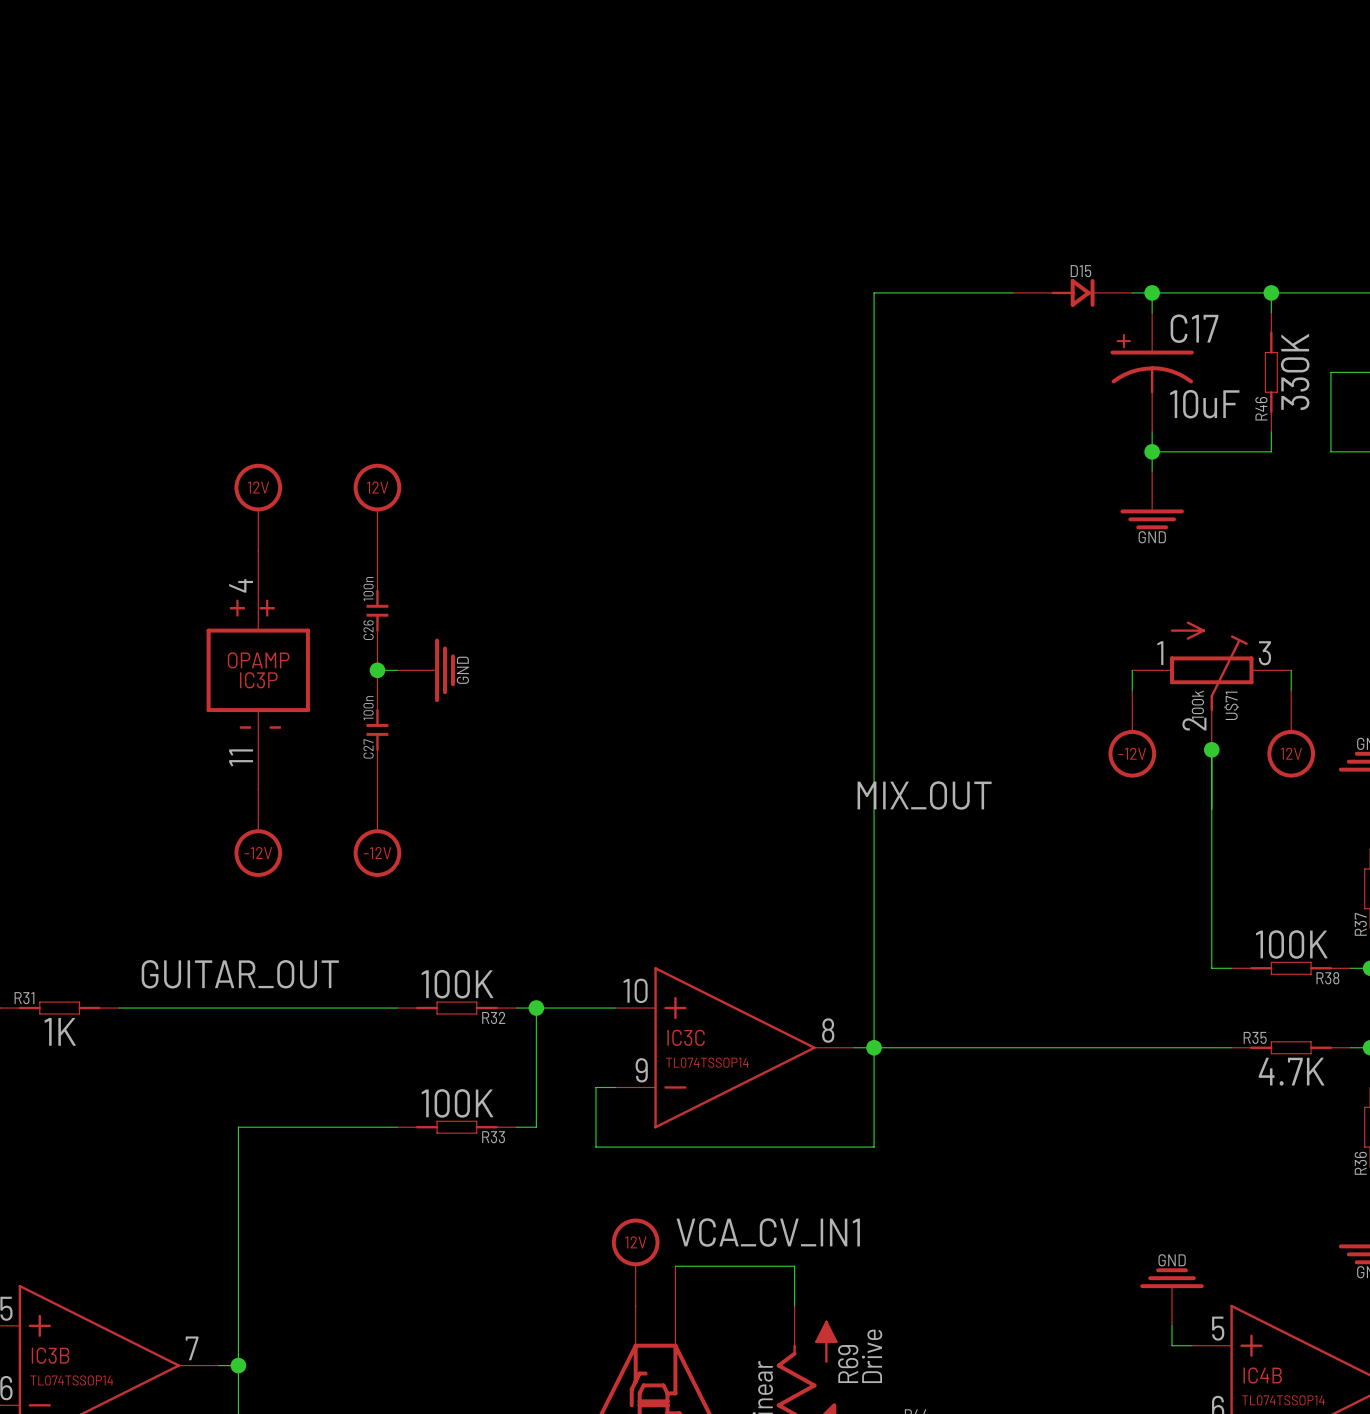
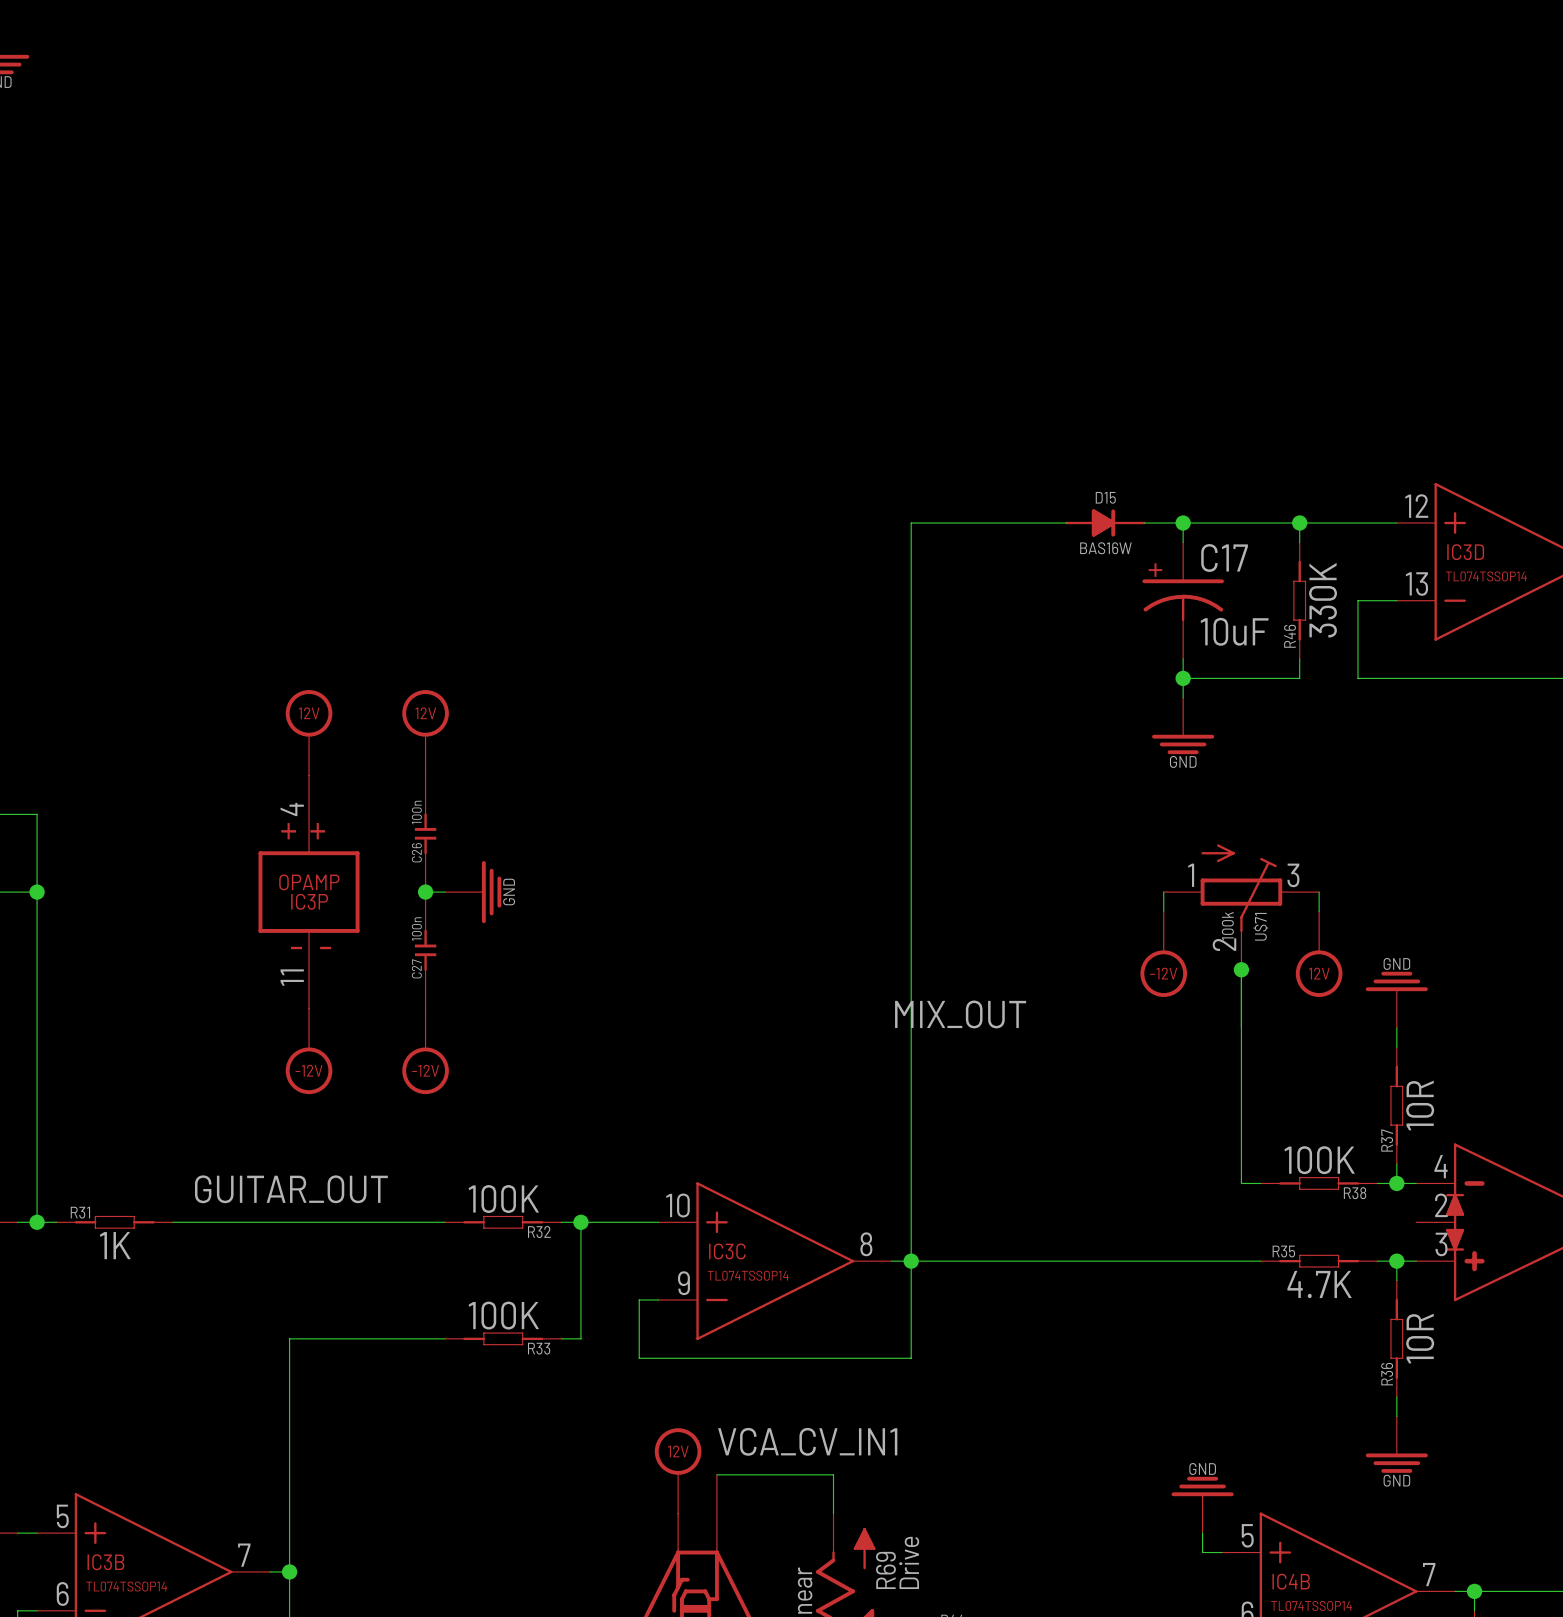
D15 symbol: [1013, 279, 1133, 307] -> [1065, 509, 1146, 537]
D15 value: none -> BAS16W (1105, 548)

